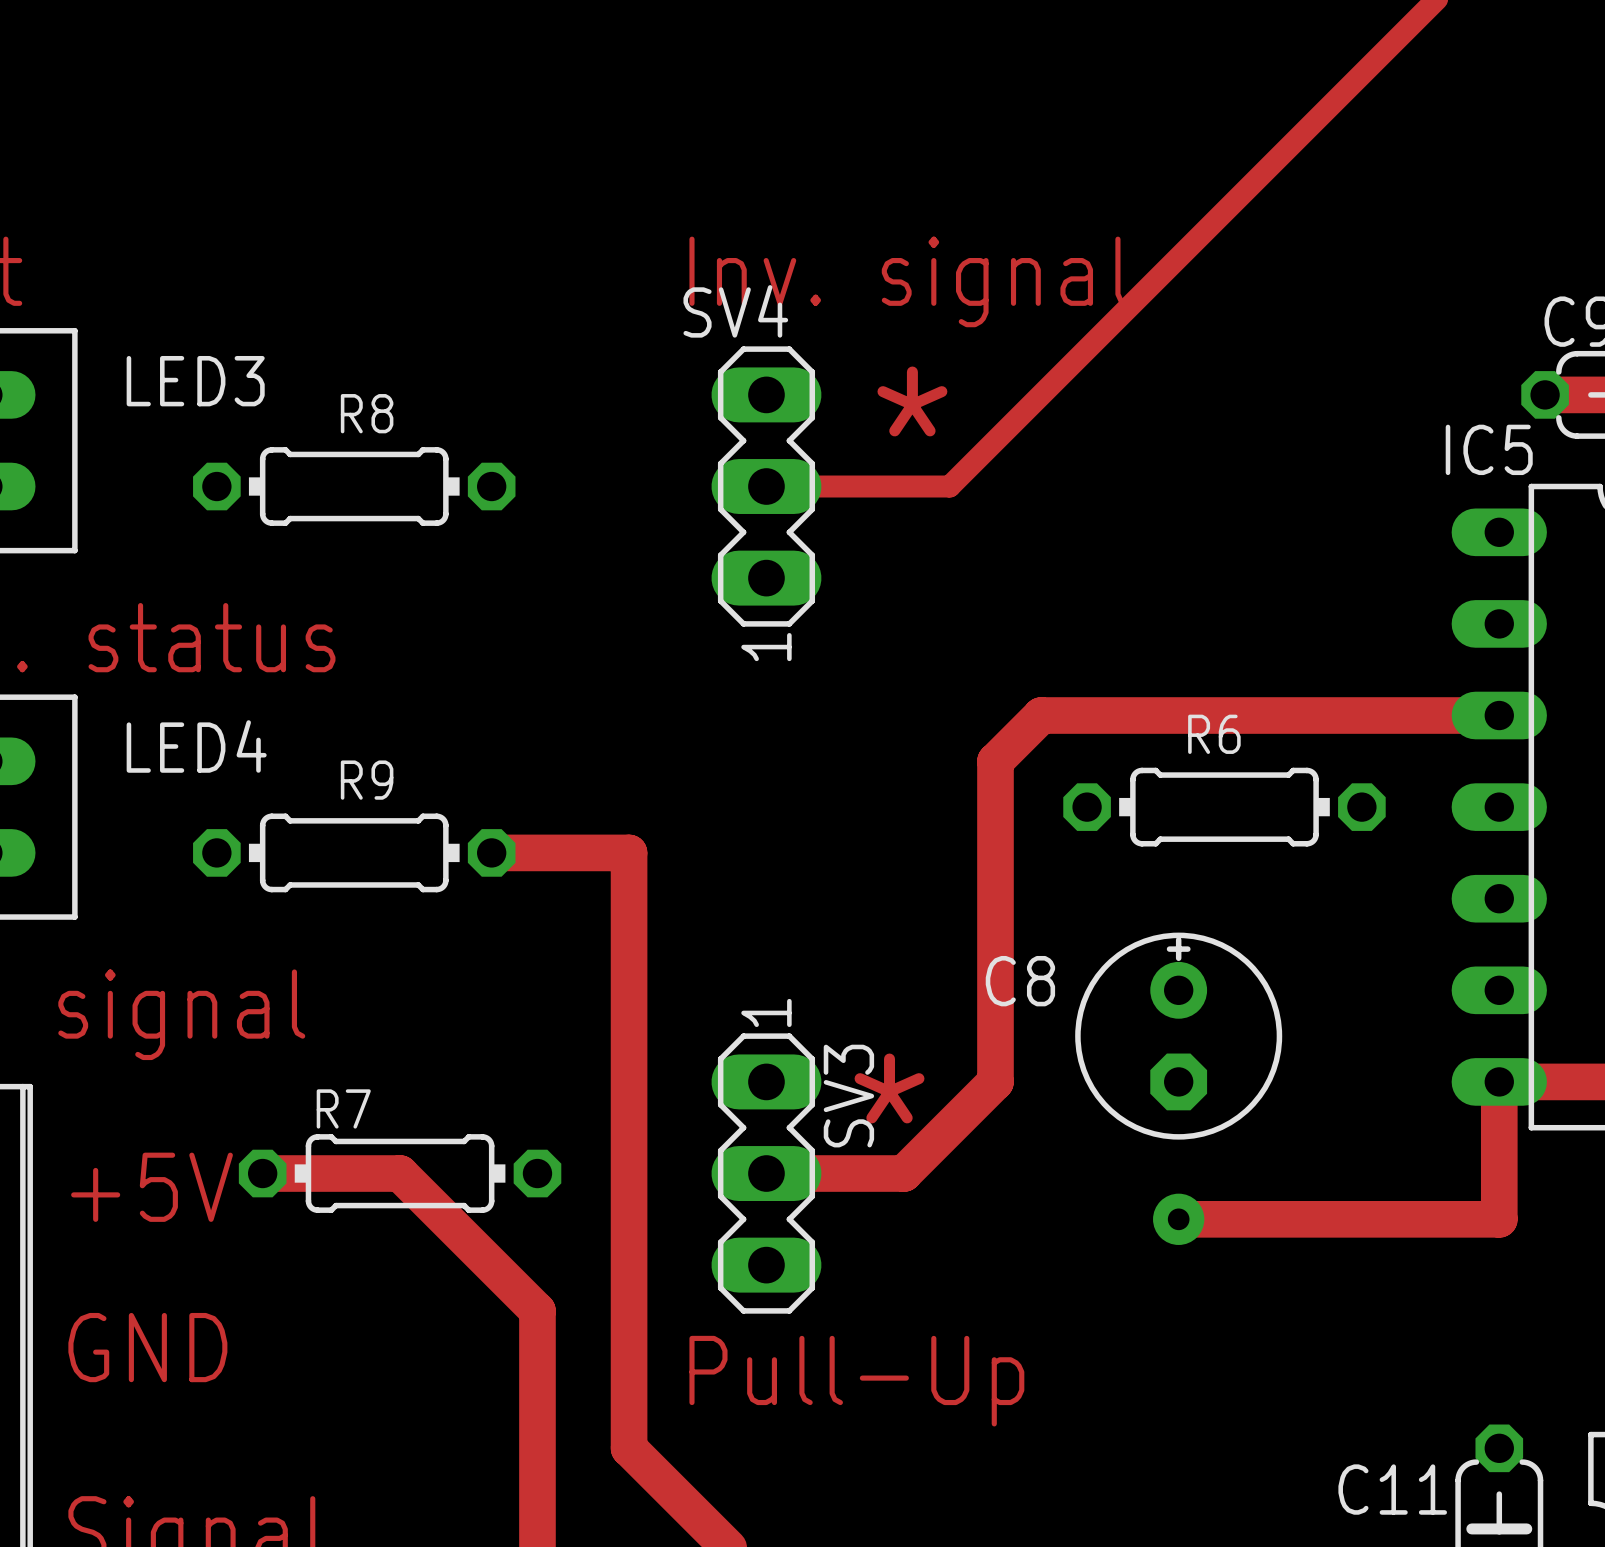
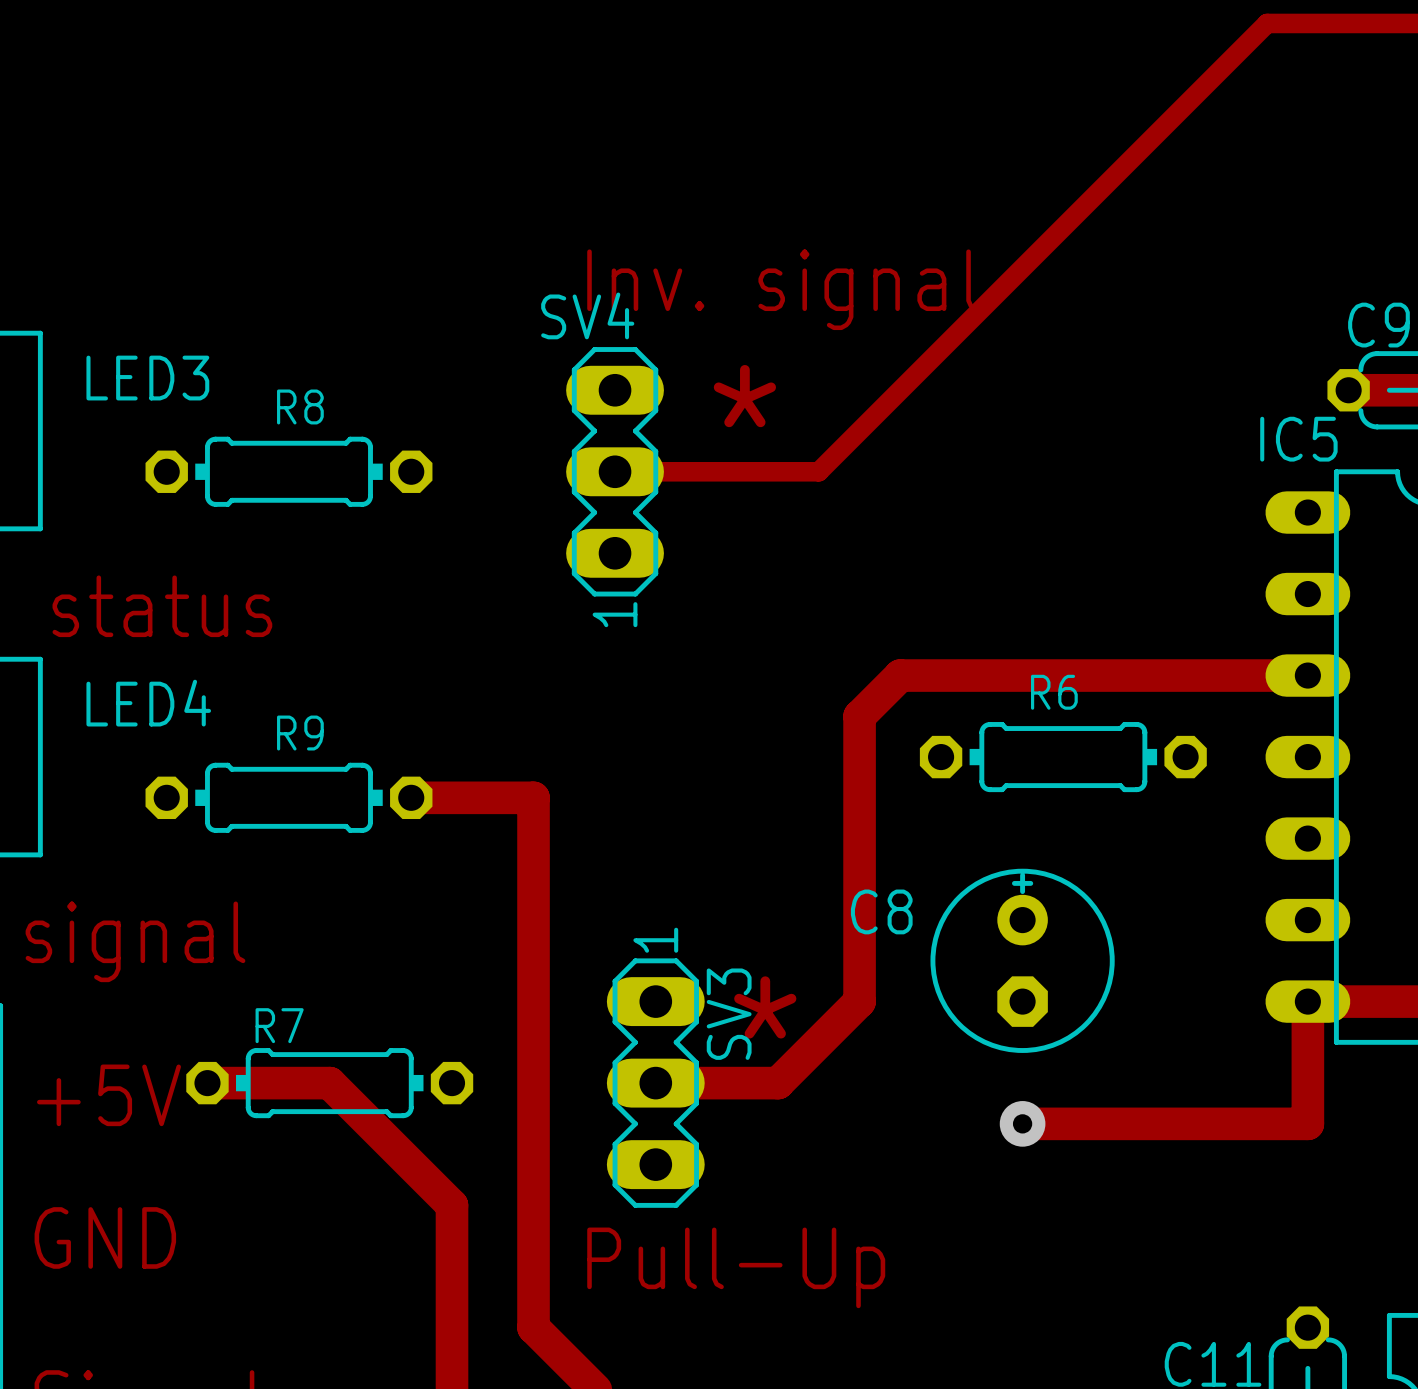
text position: * (912, 401) -> * (744, 396)
SV4 position: (766, 486) -> (615, 471)

